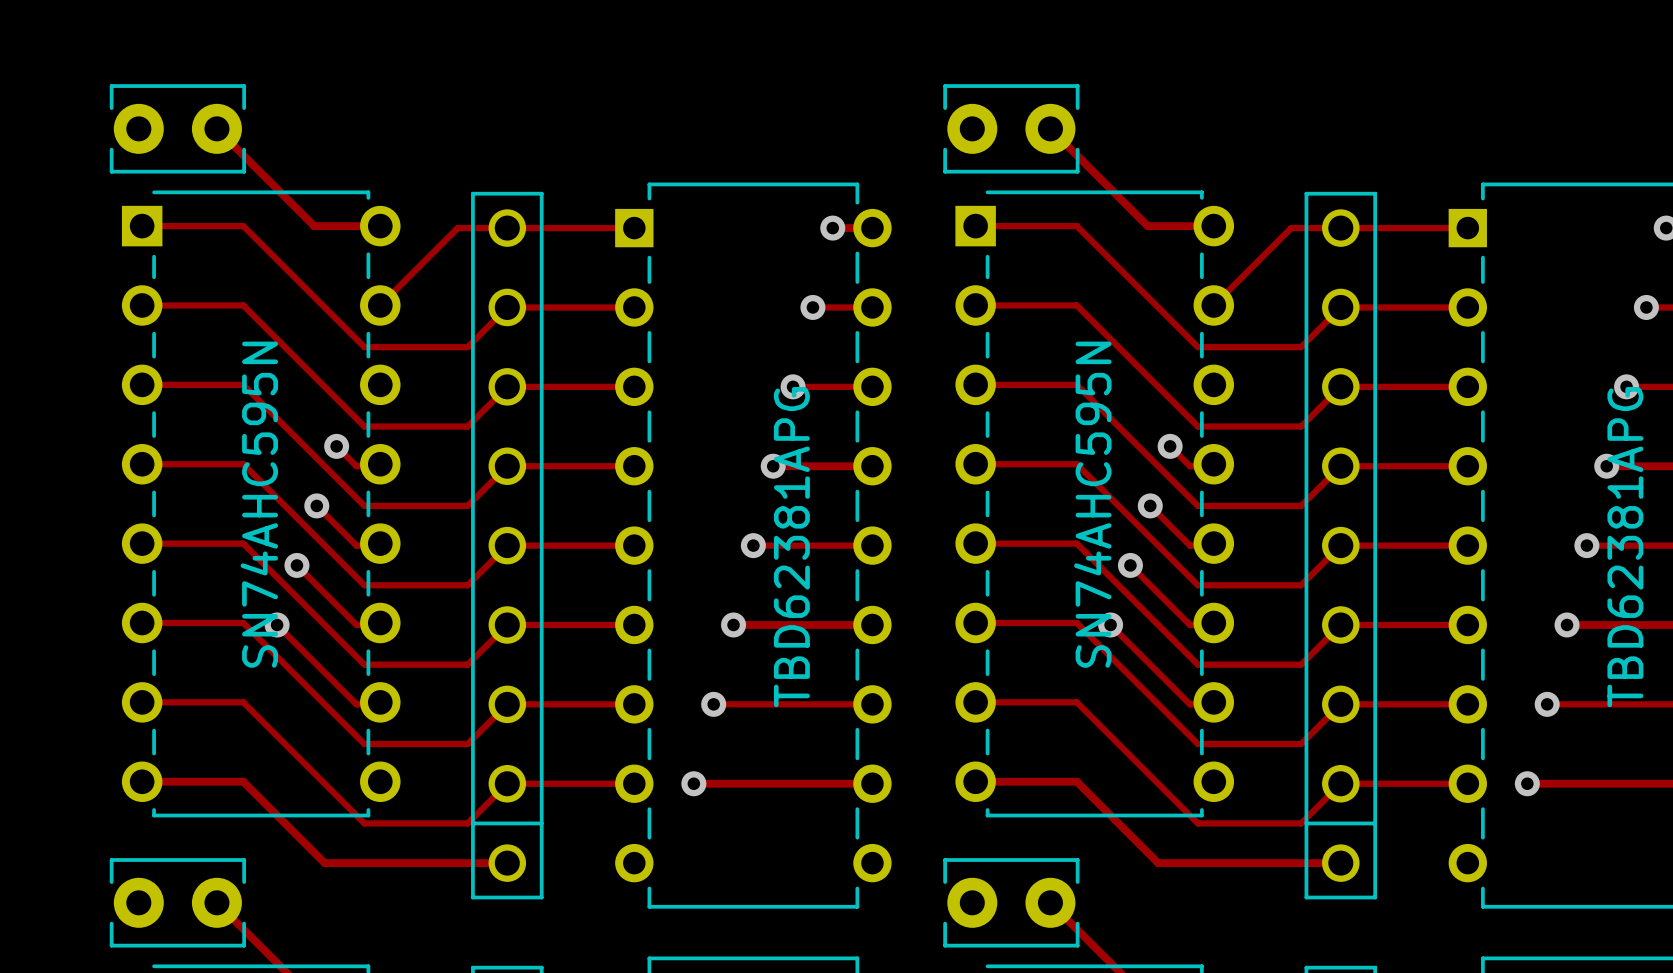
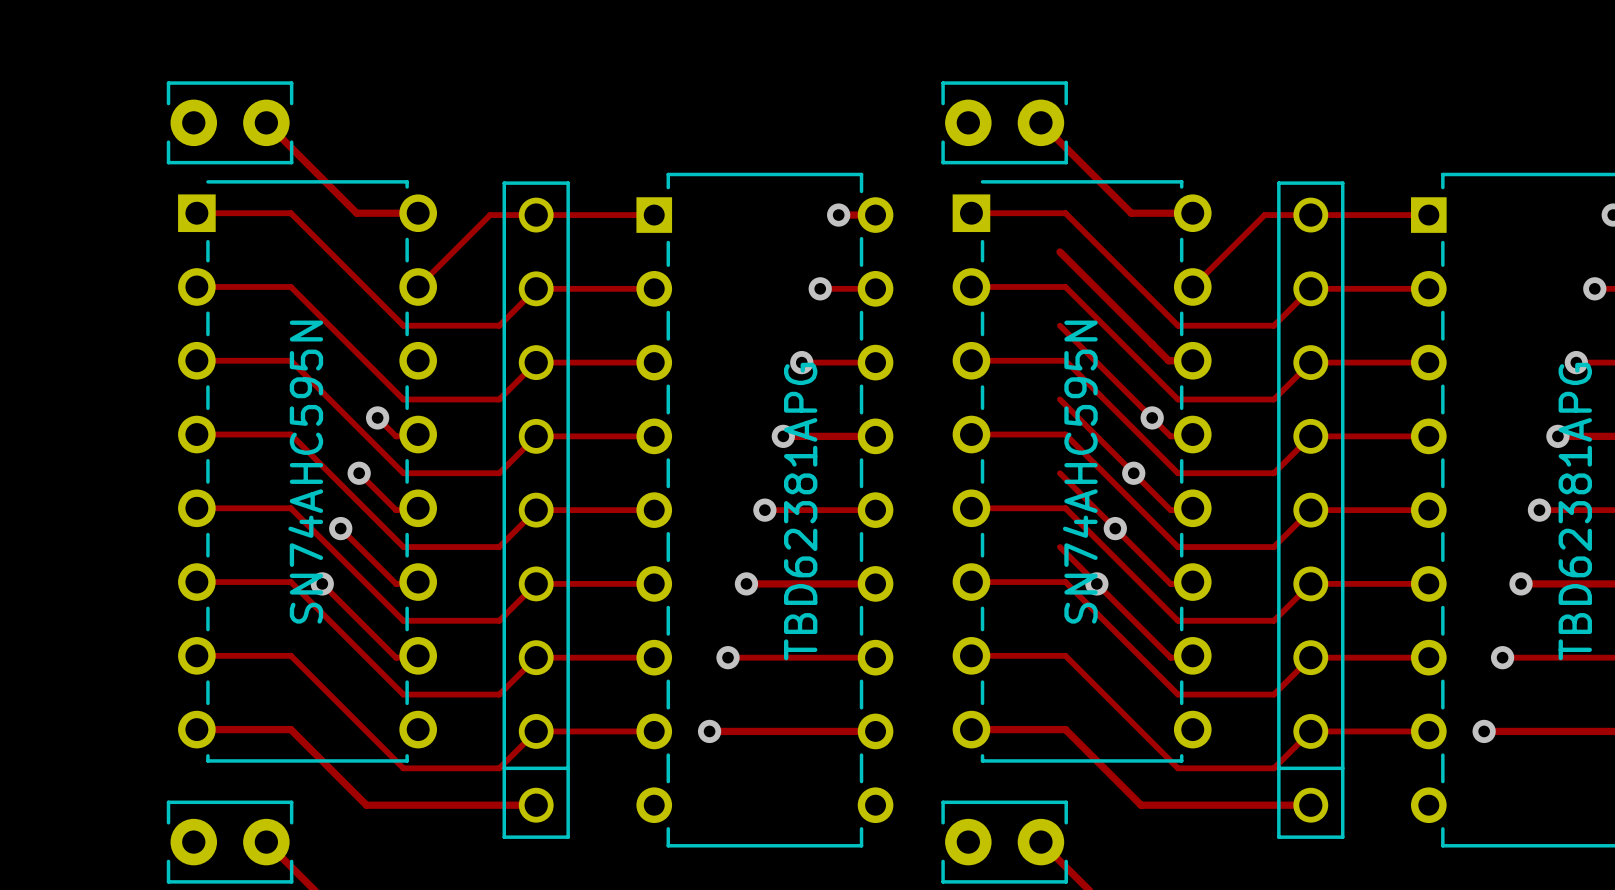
track: none -> (1059, 251) (1168, 360) (1187, 360)
track: none -> (1059, 325) (1152, 417)
track: none -> (1059, 399) (1133, 473)
track: none -> (1059, 473) (1115, 528)
track: none -> (1059, 547) (1096, 583)

